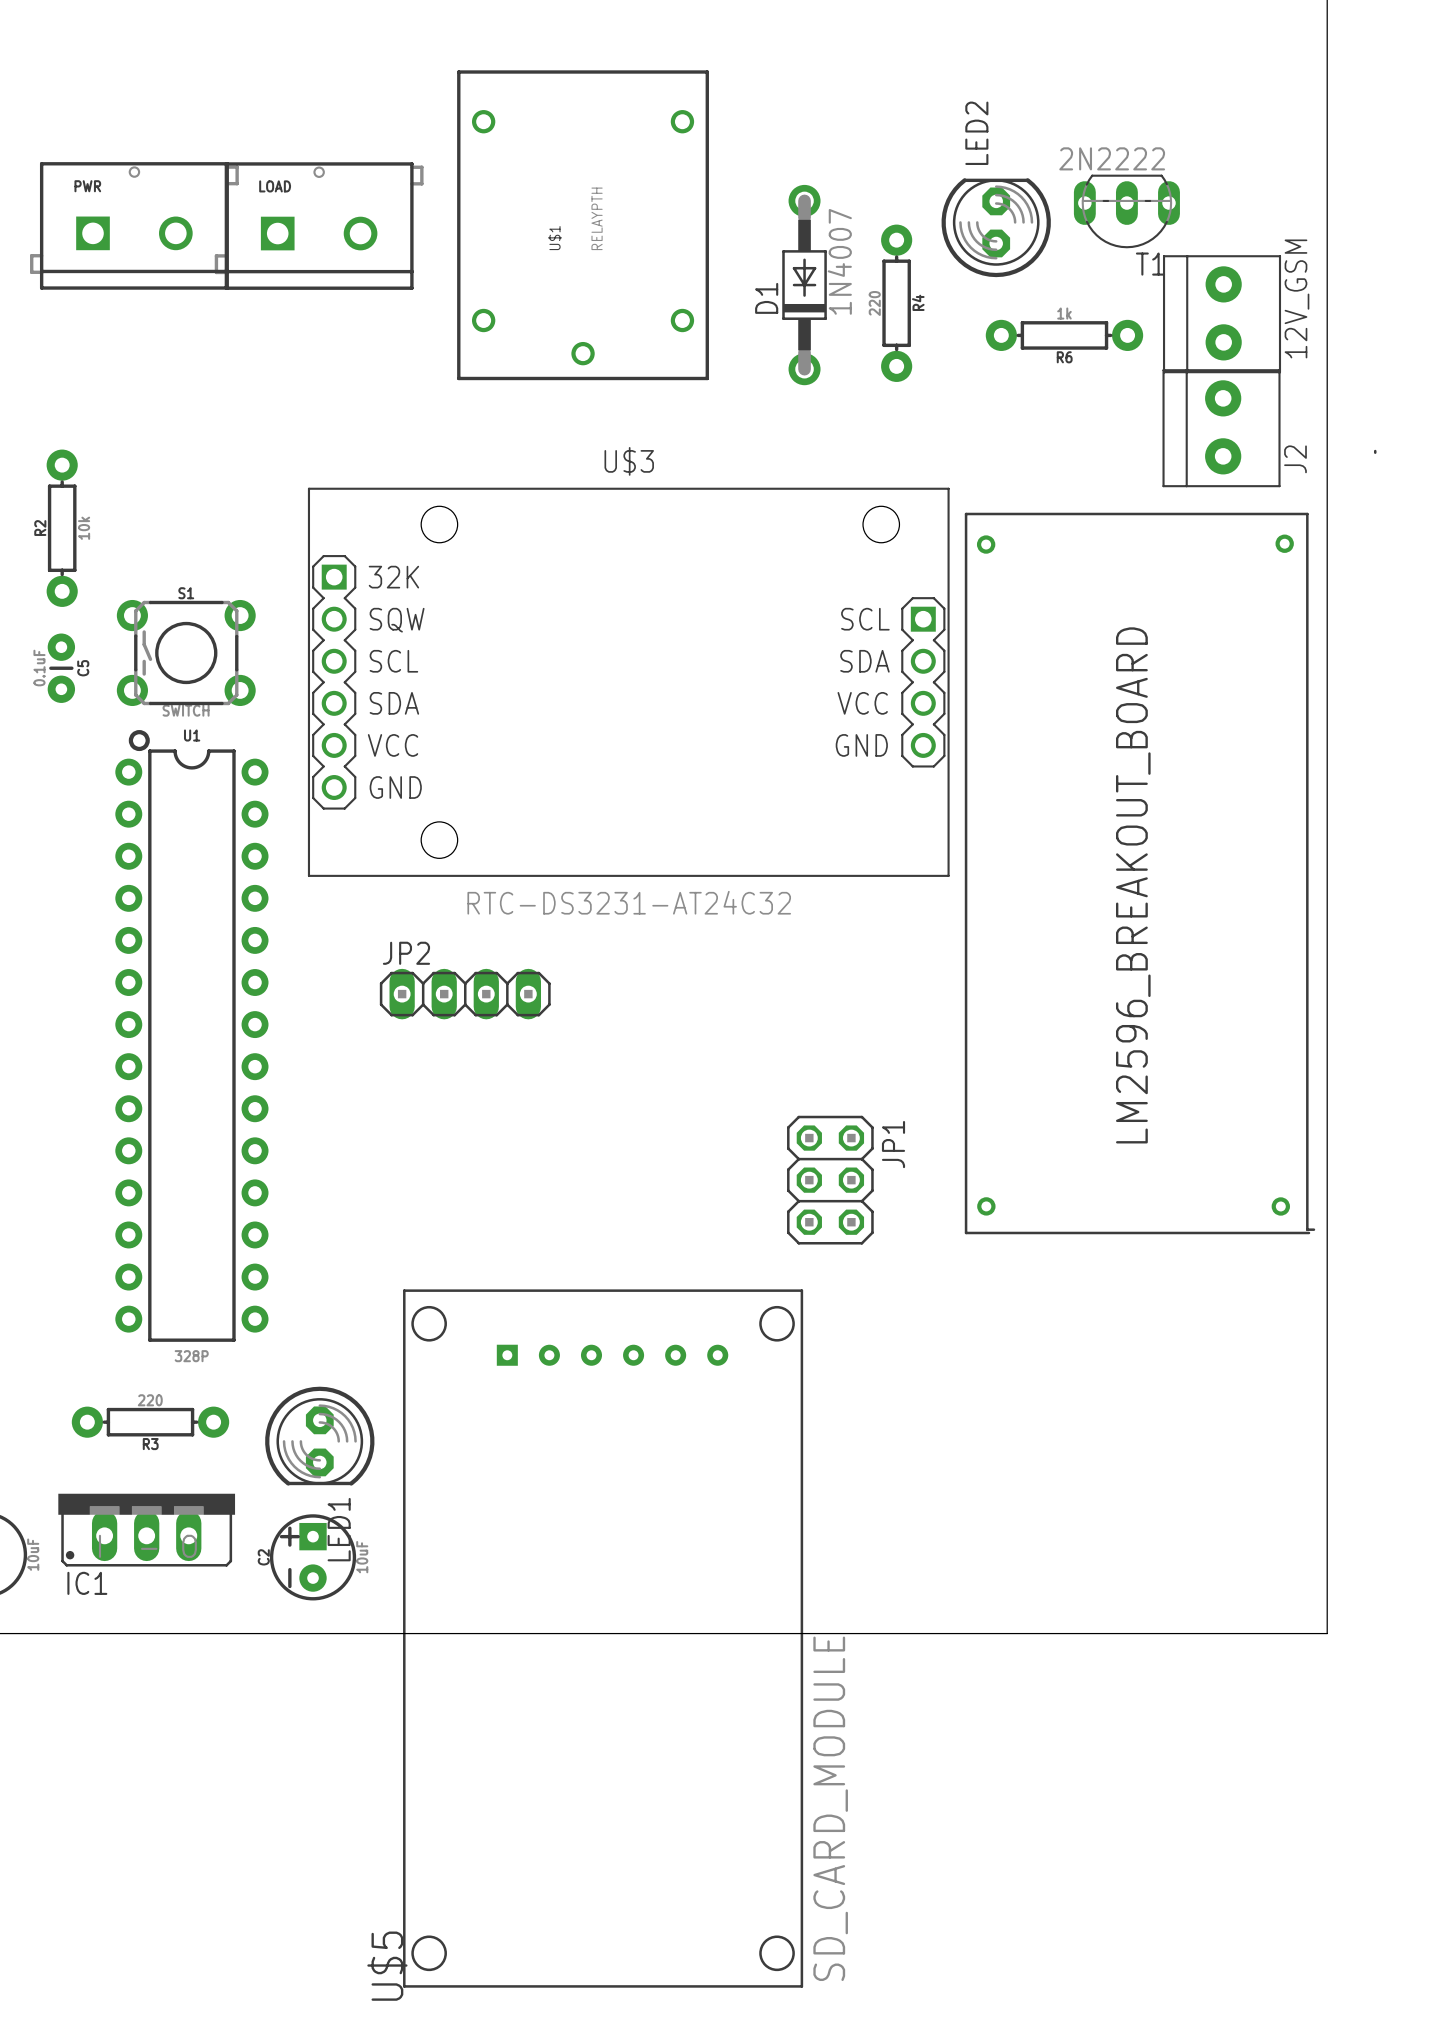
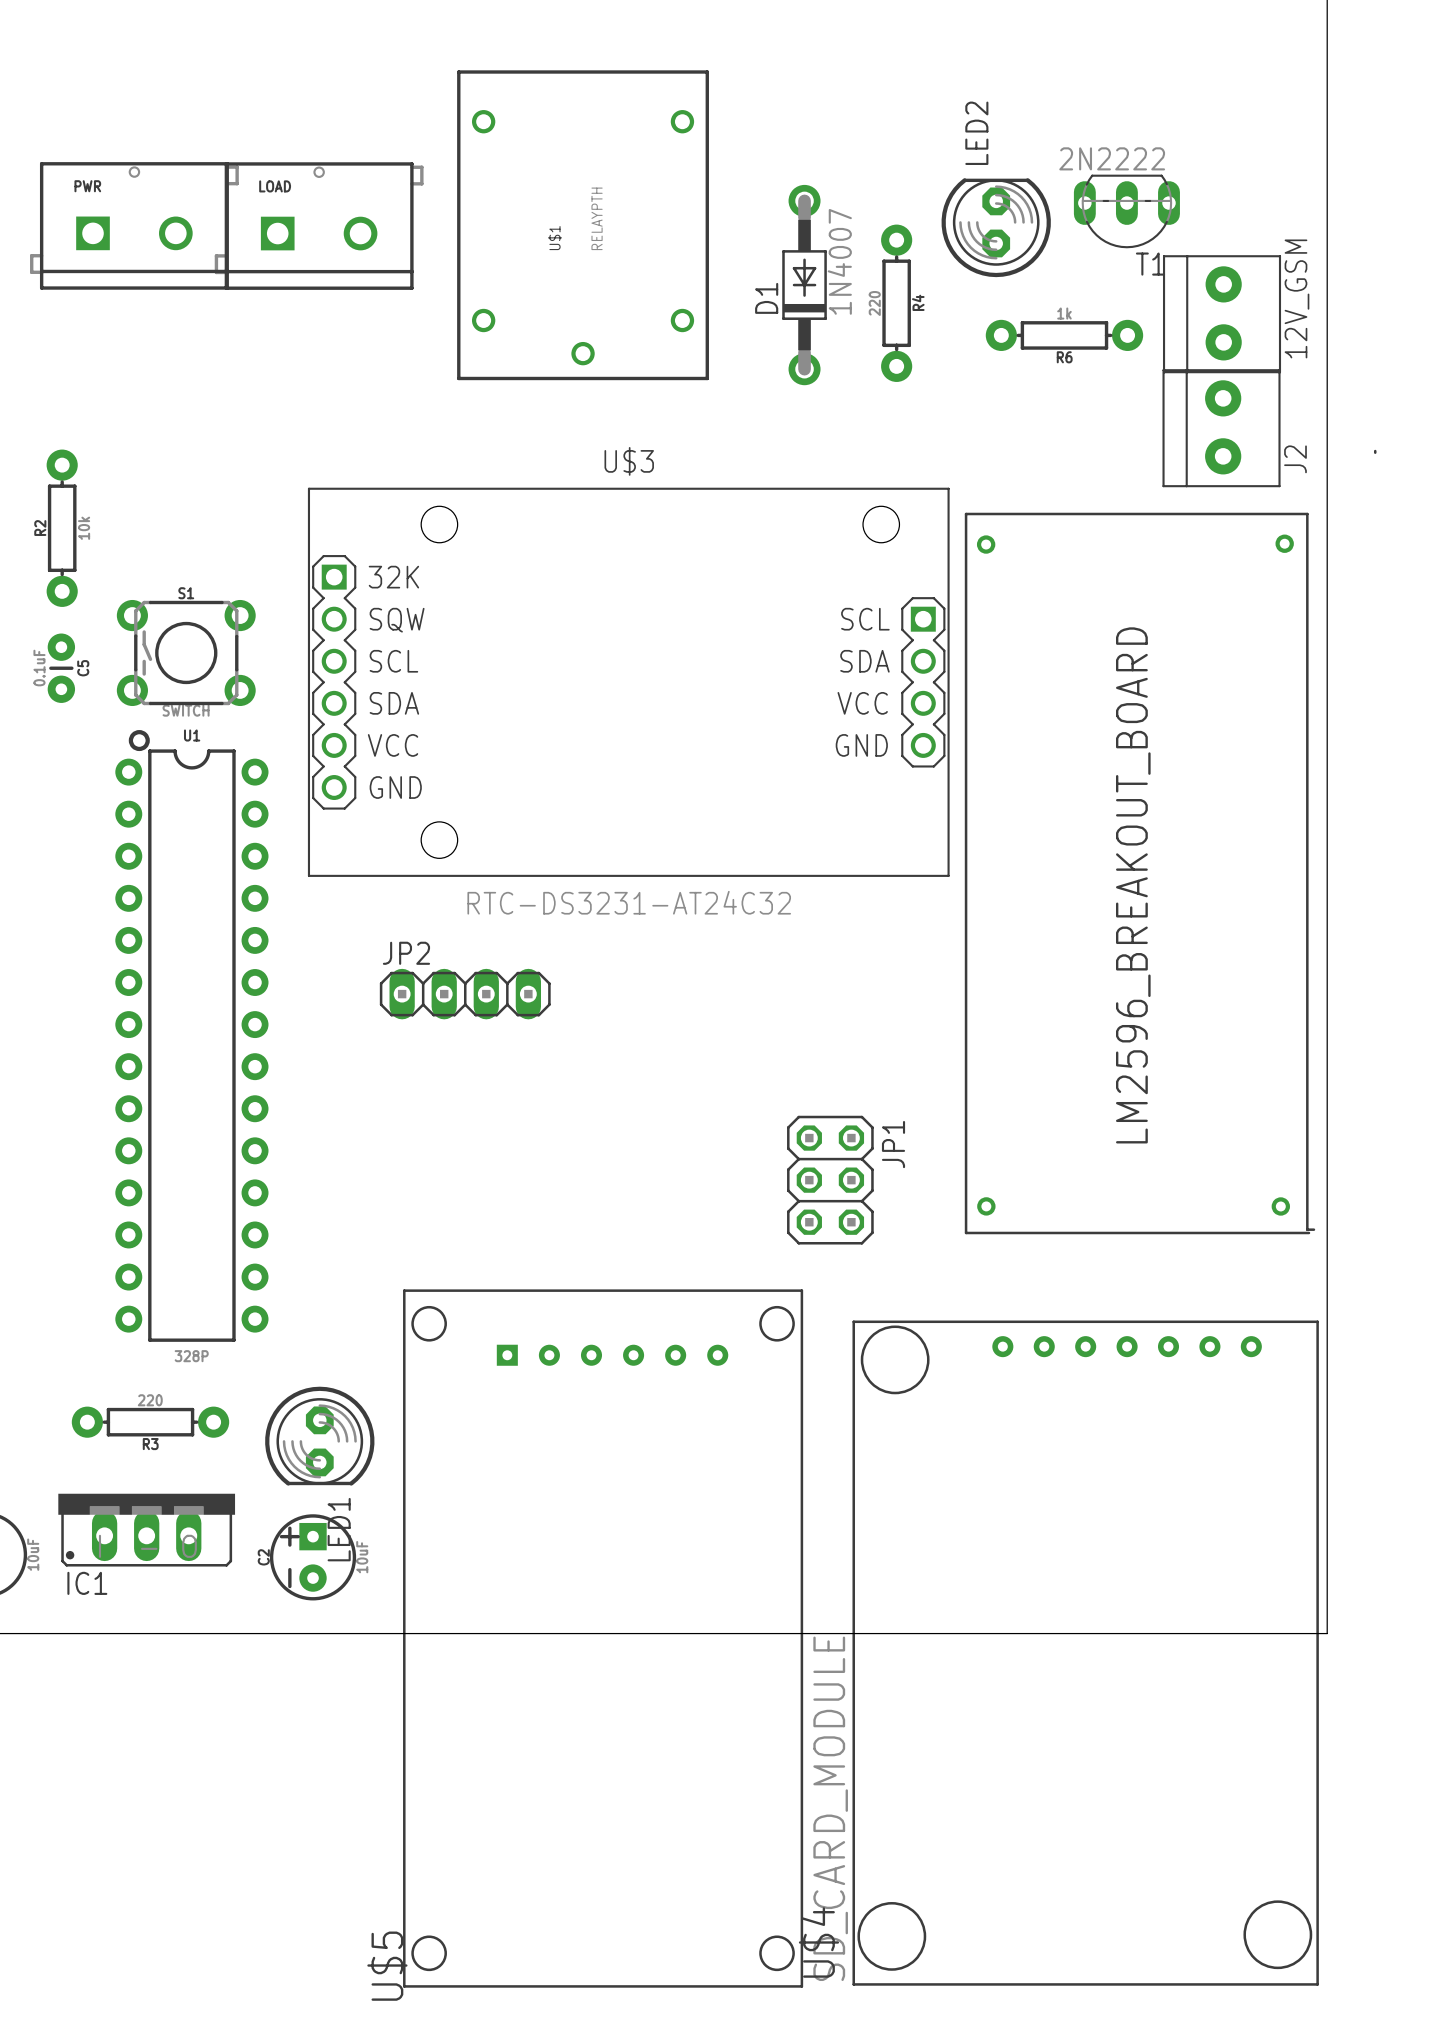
U$4: none -> (1085, 1653)

